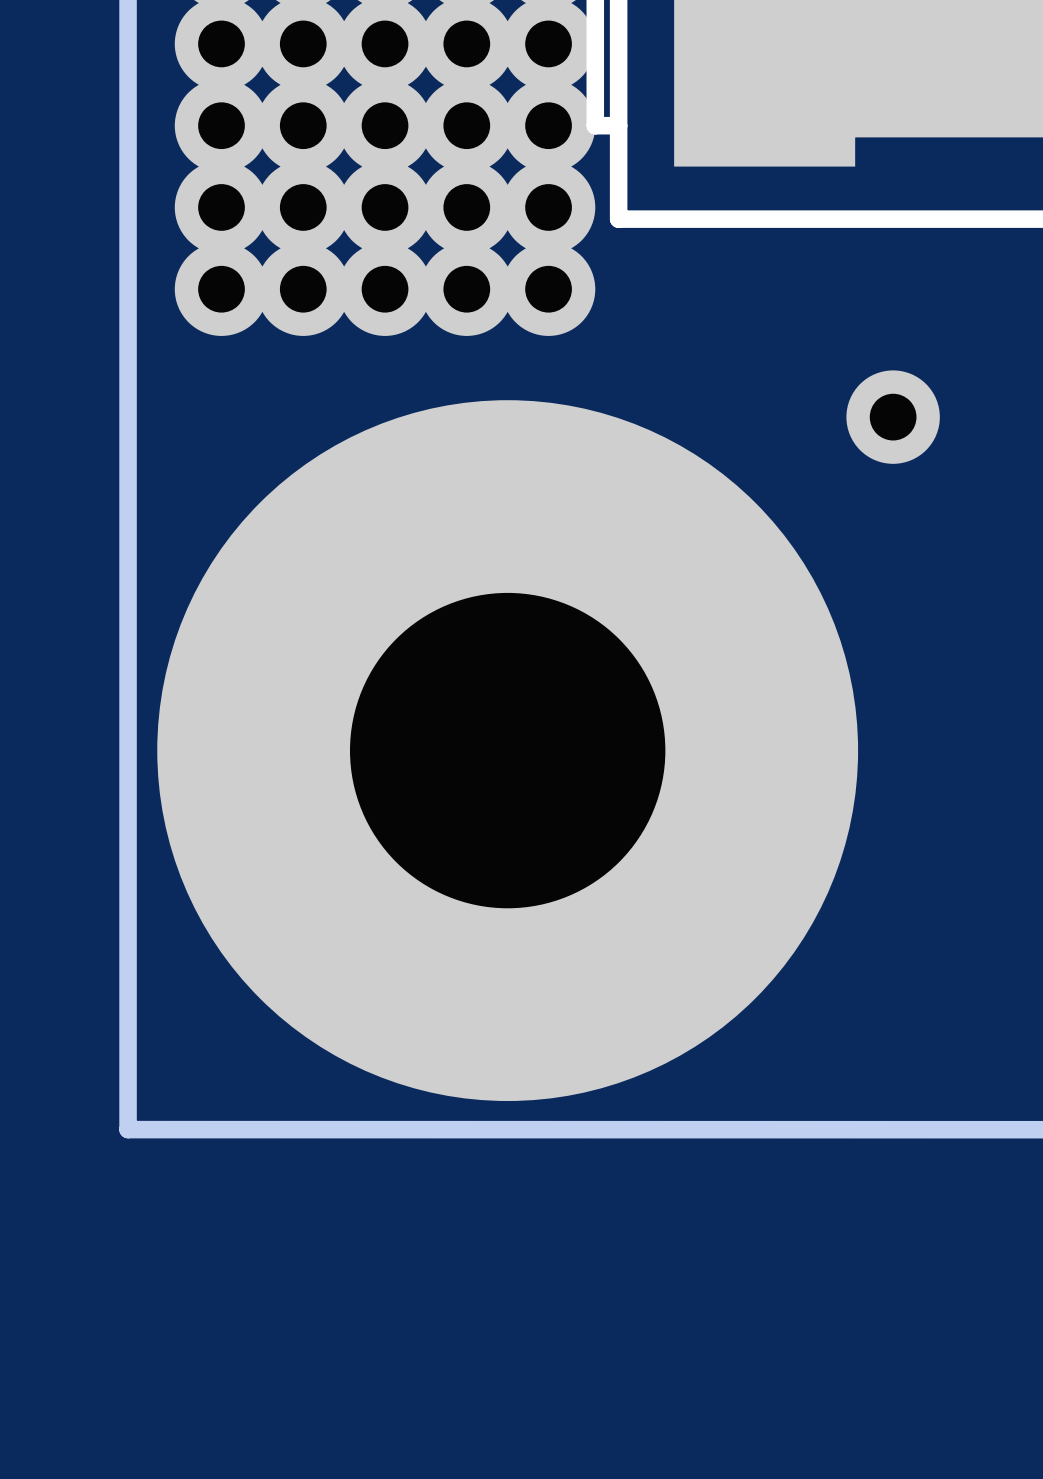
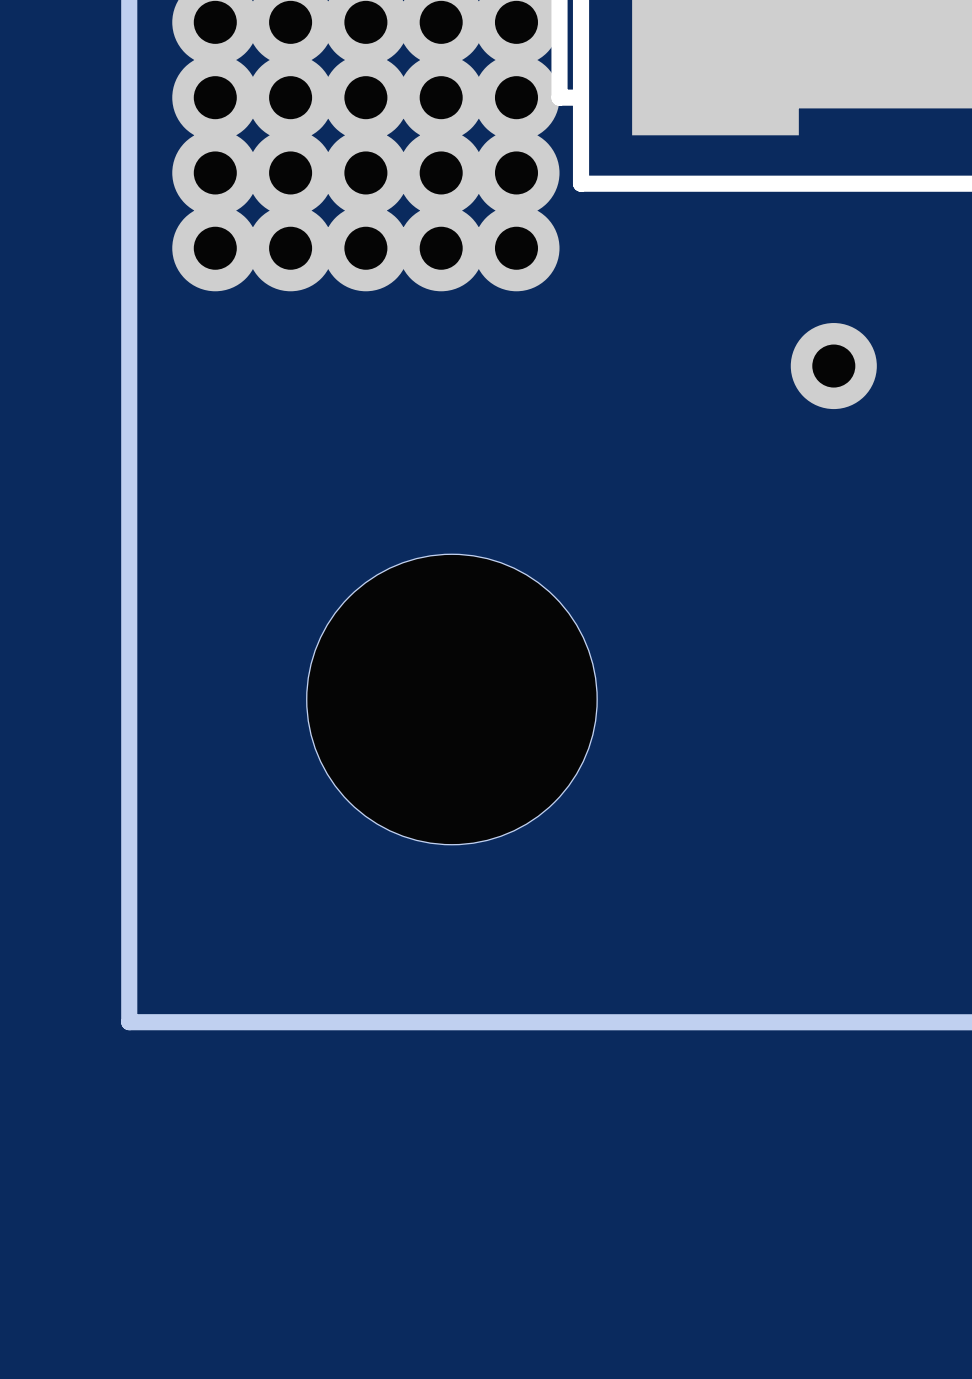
part footprint: [157, 400, 859, 1102] -> [306, 554, 598, 845]

